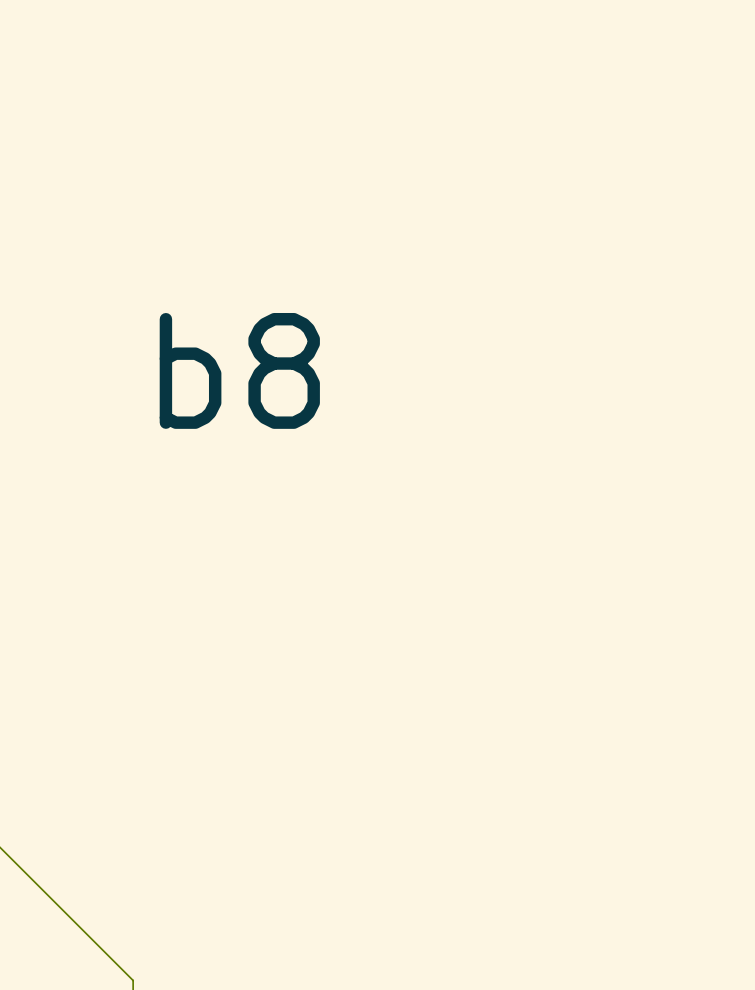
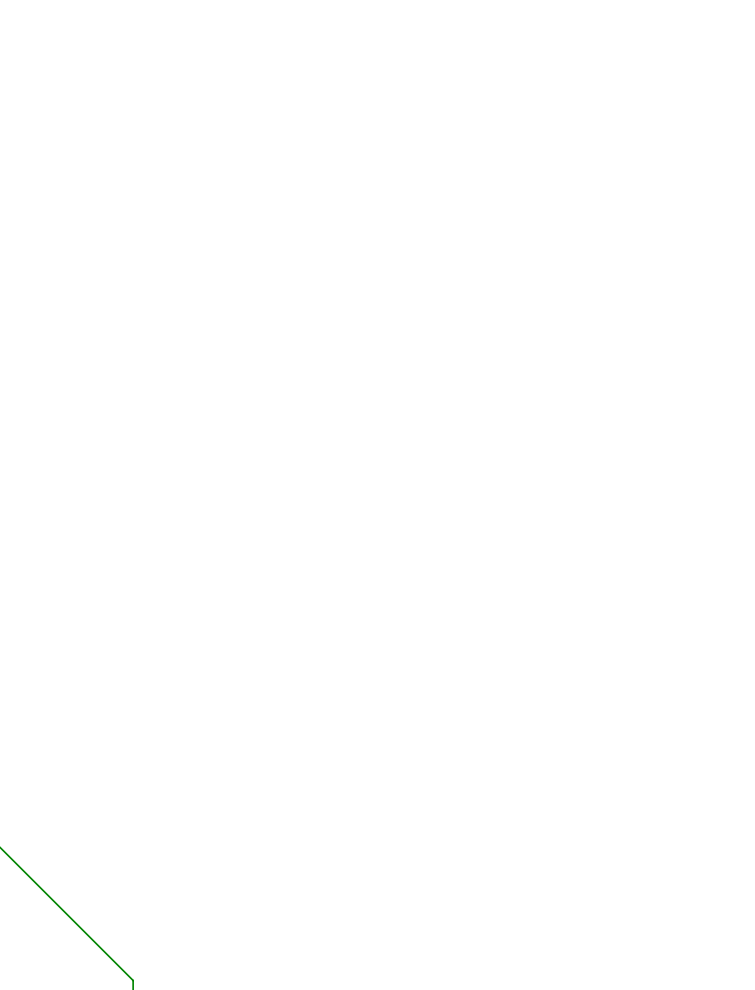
label: b8 (239, 370) -> none

